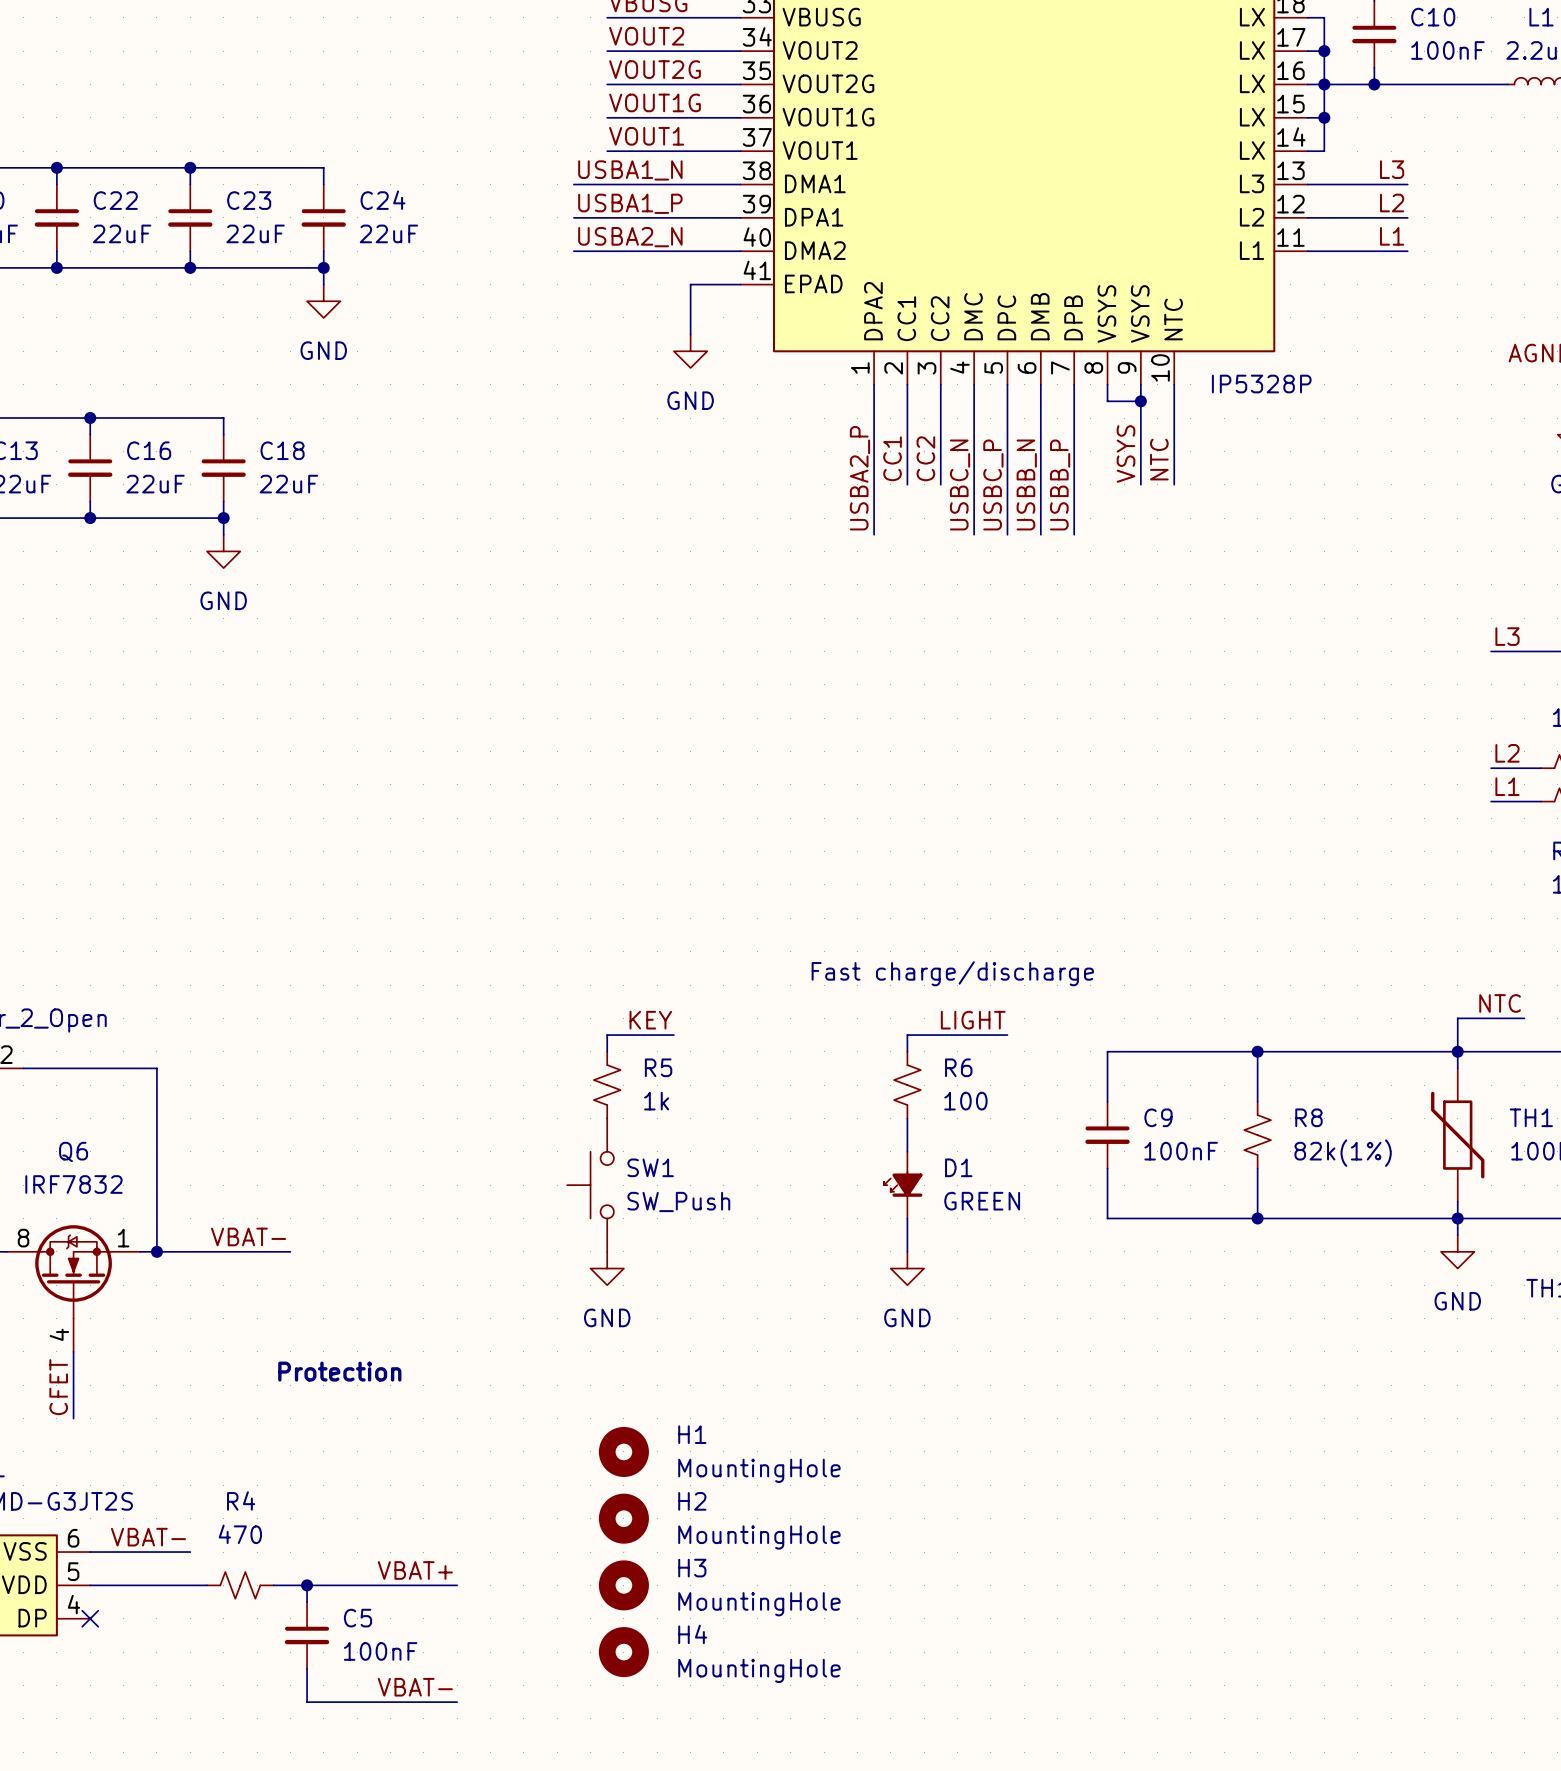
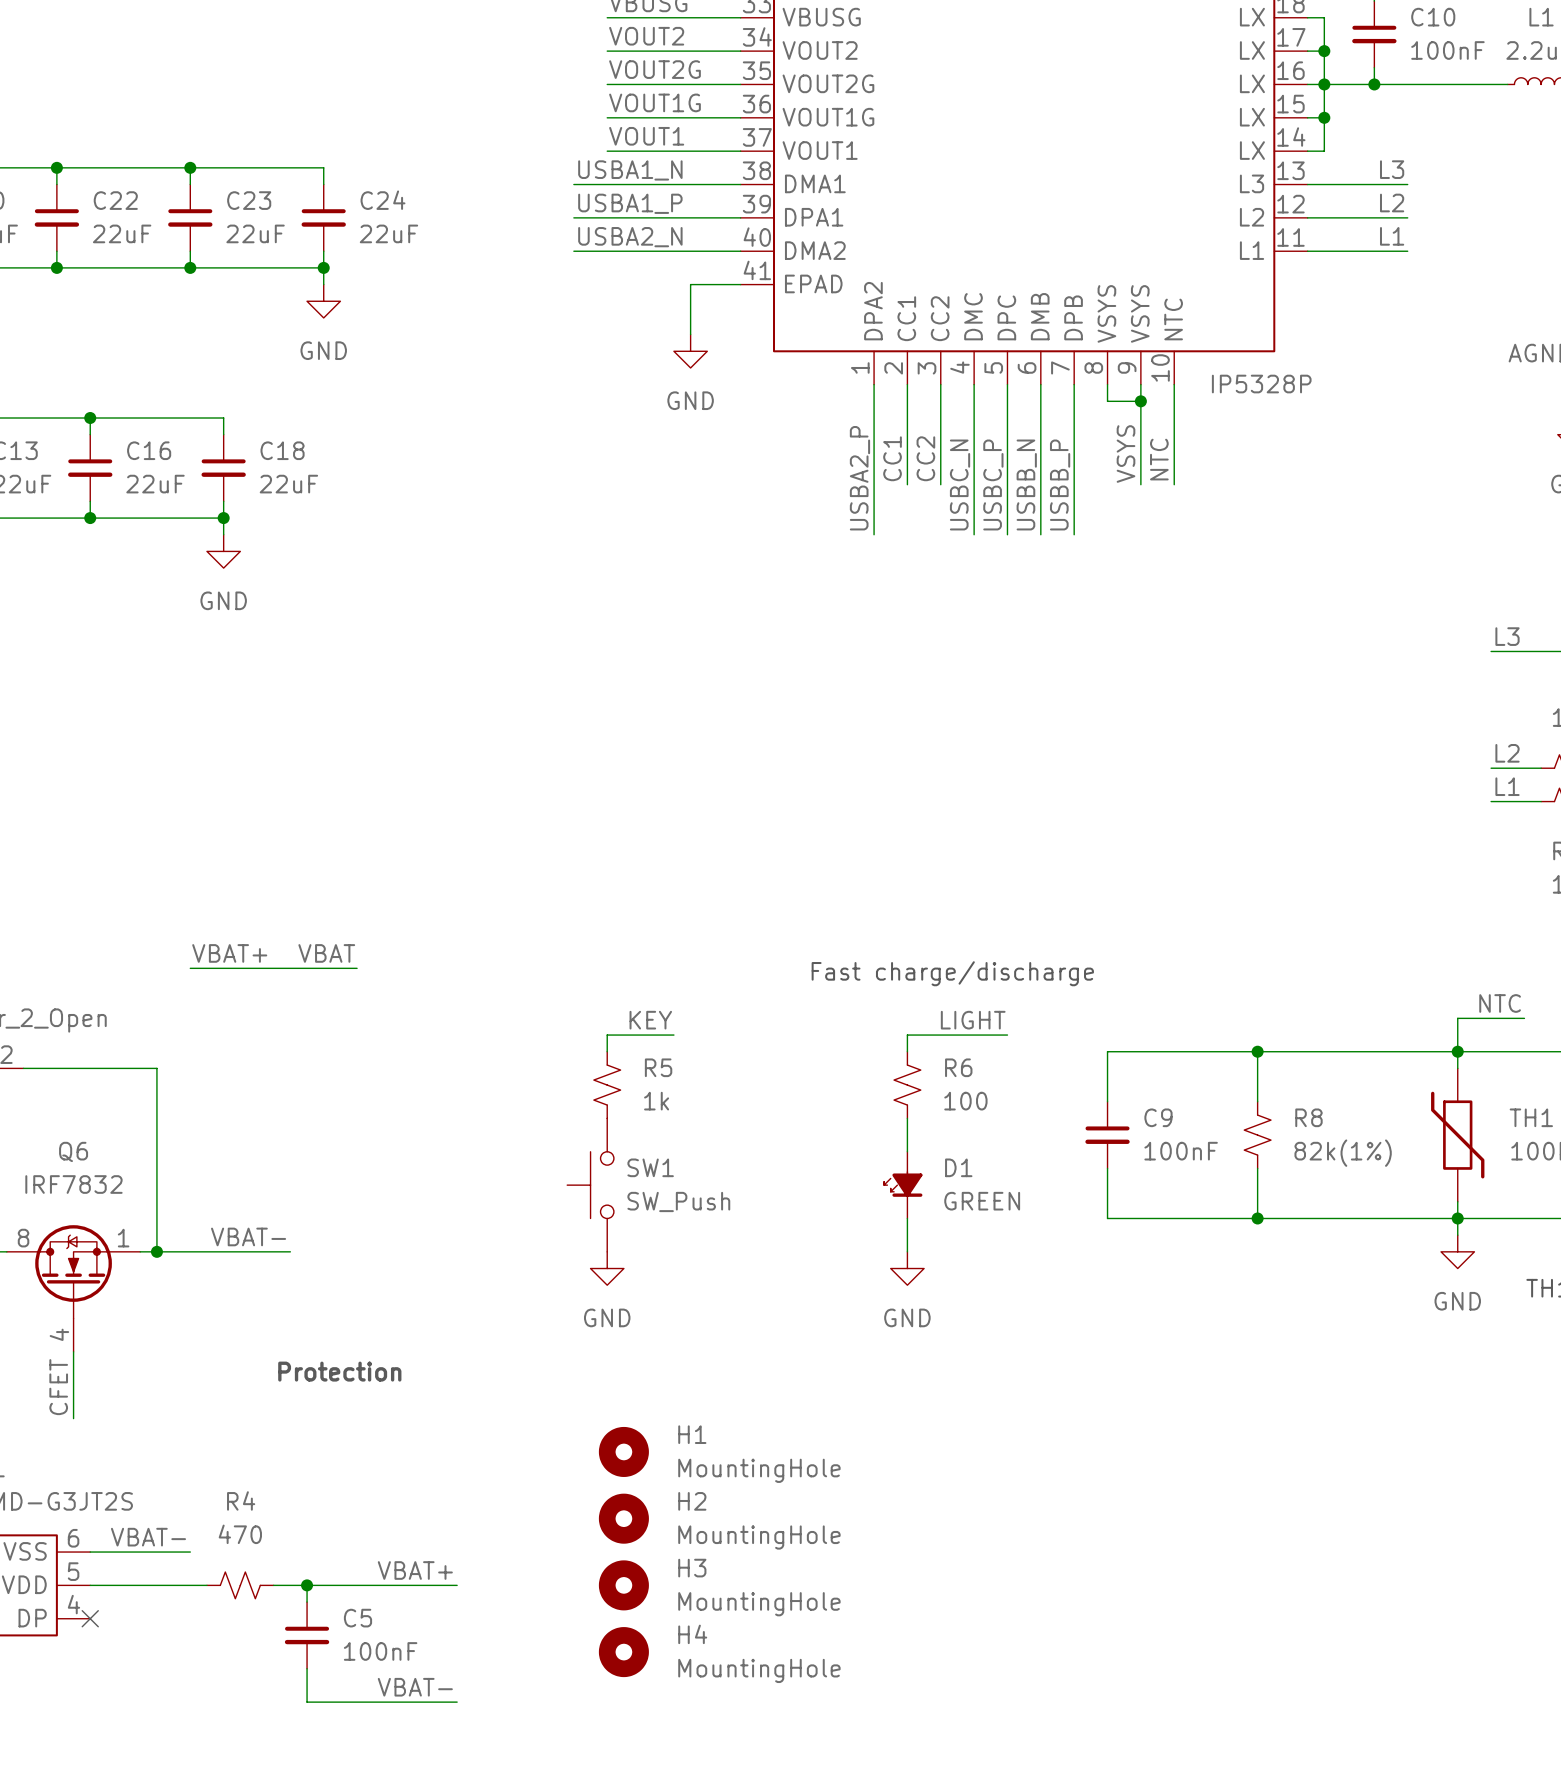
label: none -> VBAT+ (229, 953)
label: none -> VBAT (326, 953)
wire: none -> (190, 968) (357, 968)

